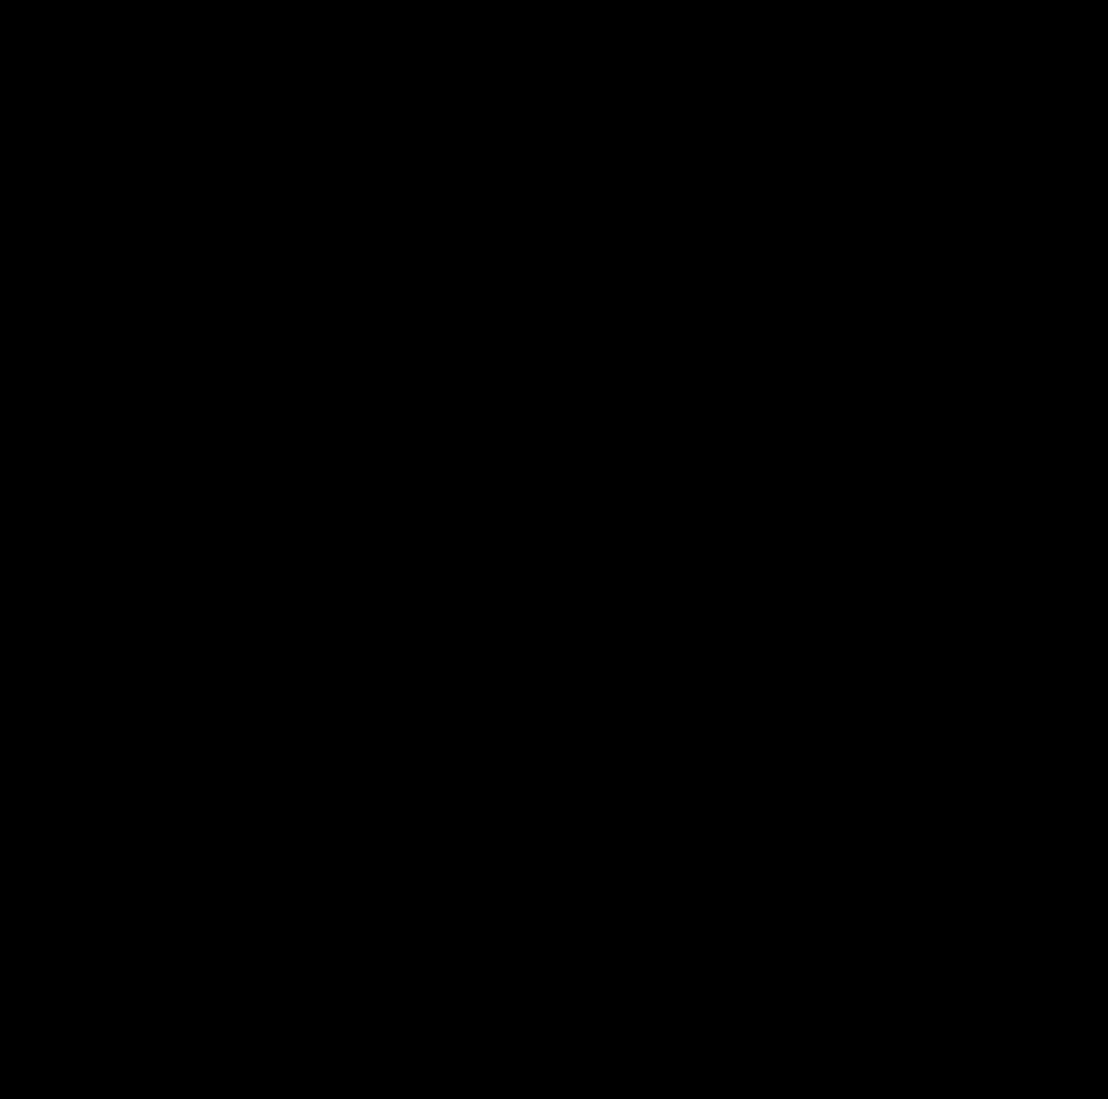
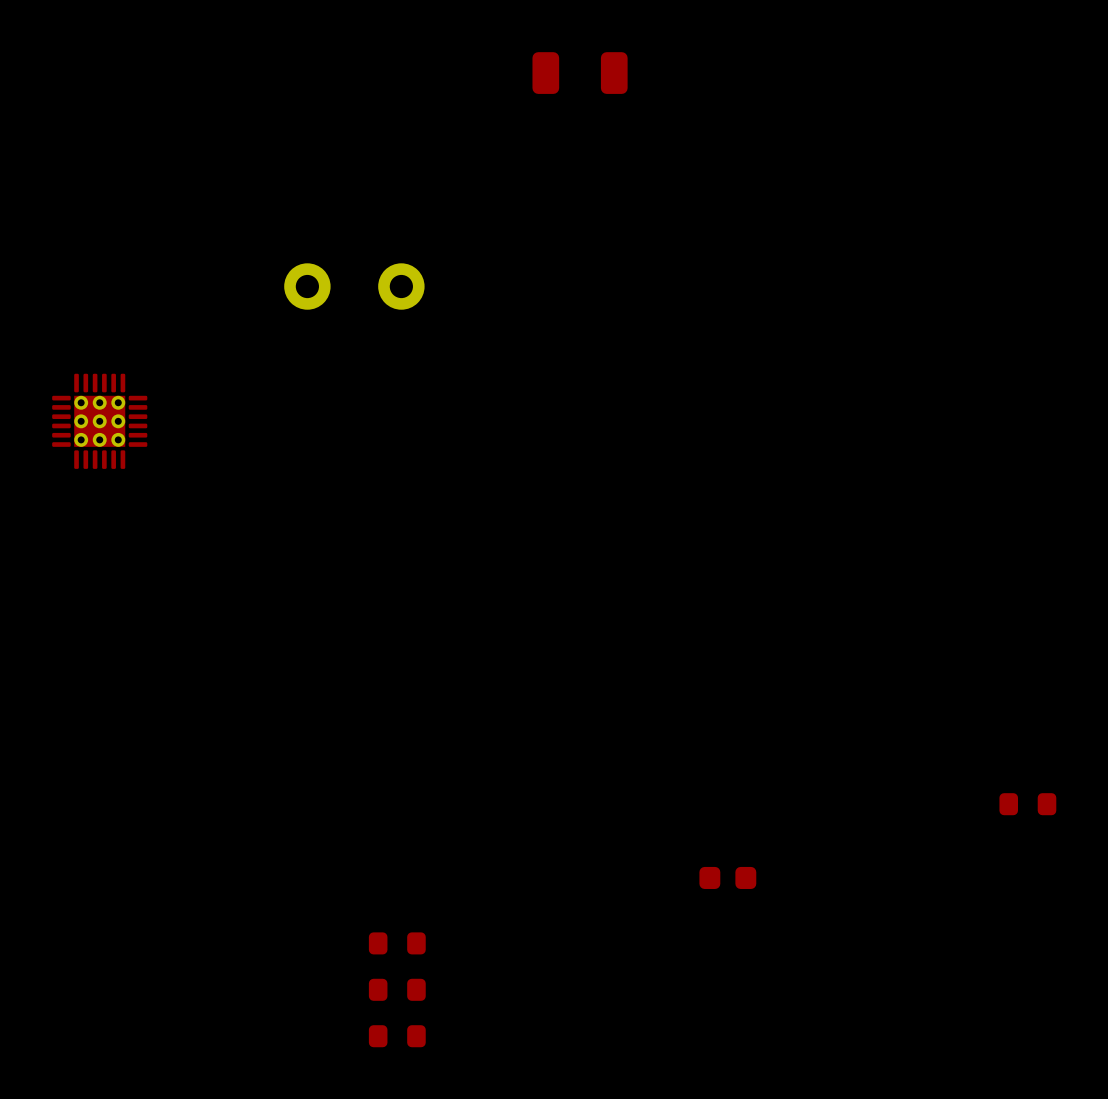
part: none -> (580, 73)
part: none -> (307, 286)
part: none -> (401, 286)
part: none -> (99, 421)
part: none -> (1027, 804)
part: none -> (727, 877)
part: none -> (397, 943)
part: none -> (397, 989)
part: none -> (397, 1036)

